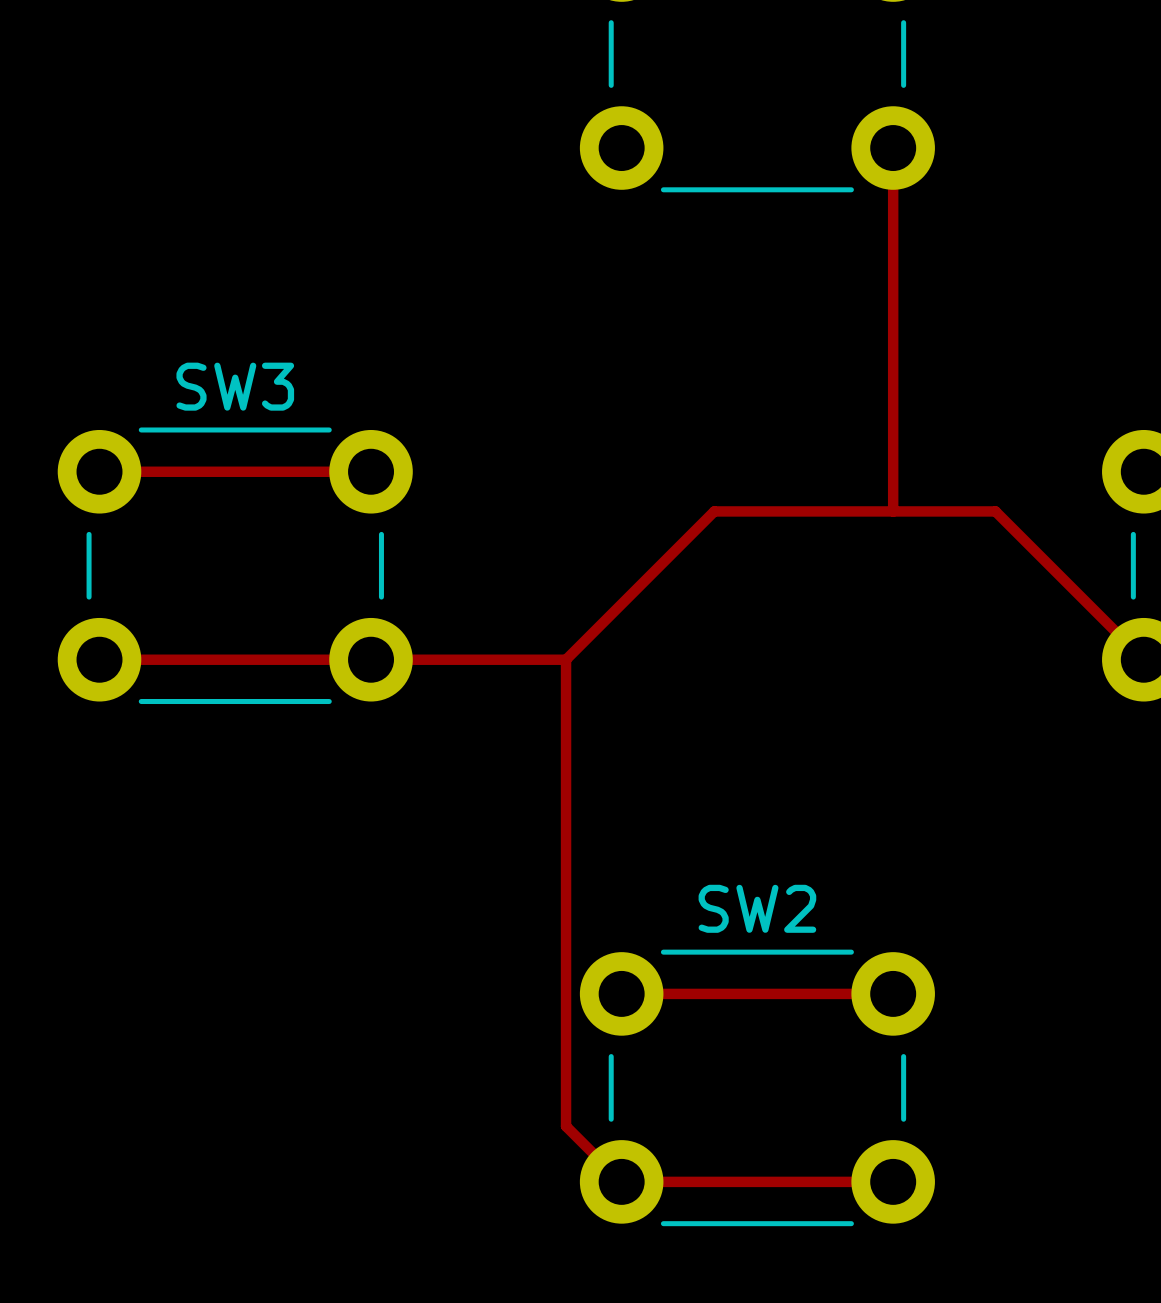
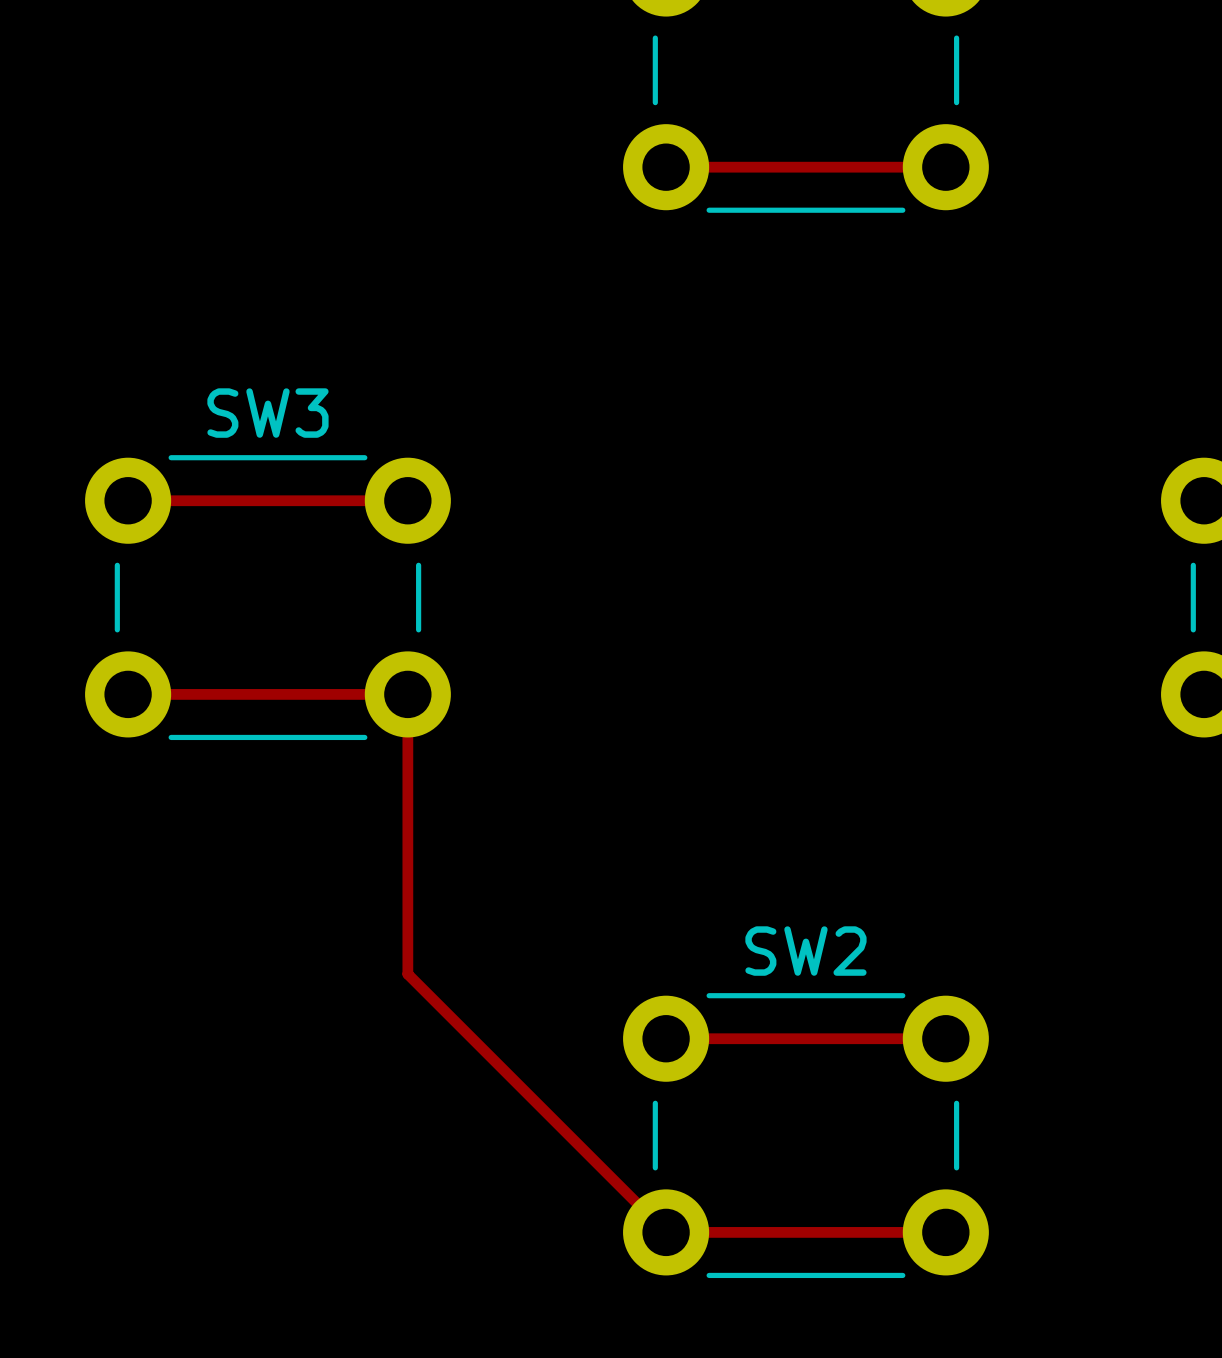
track: (893, 148) (893, 511) -> (945, 167) (666, 167)
track: (371, 659) (566, 659) -> none
track: (566, 659) (566, 1126) -> (407, 694) (407, 974) (608, 1175)
track: (566, 659) (714, 511) (995, 511) (1143, 659) -> none

